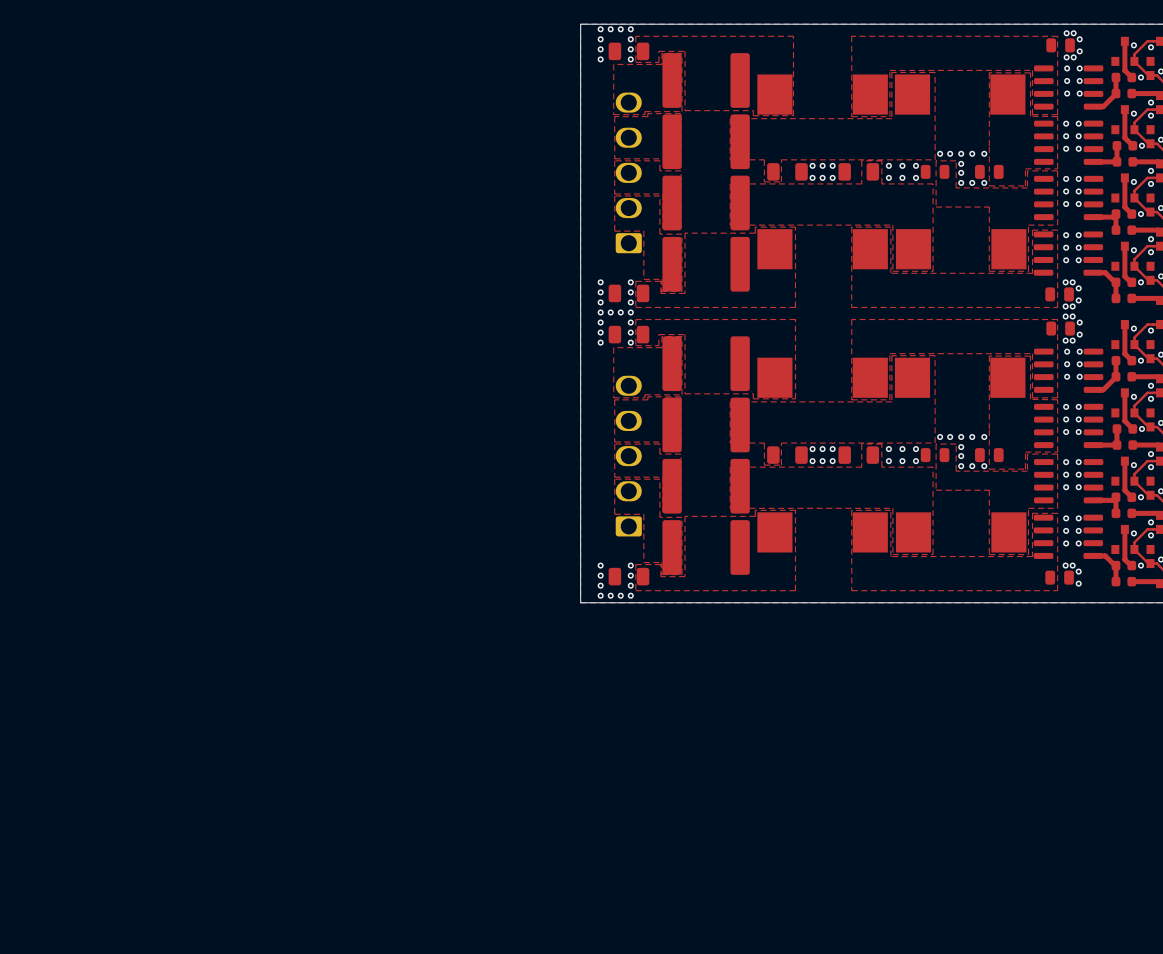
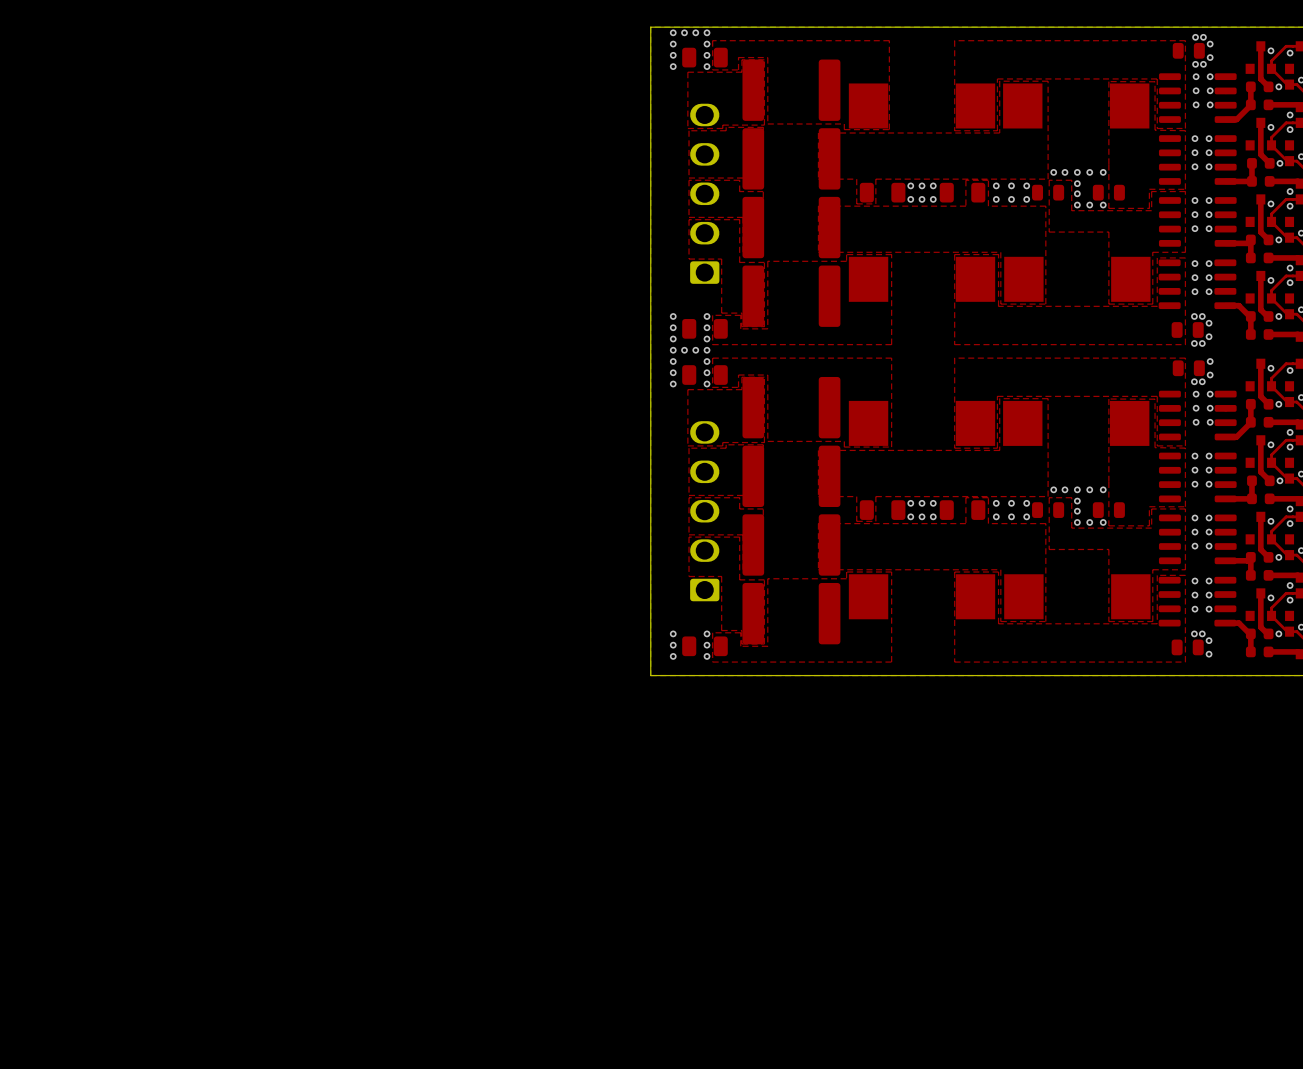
via: (1065, 316) -> none
via: (1072, 316) -> none
via: (600, 595) -> none
via: (610, 595) -> none
via: (620, 595) -> none
via: (630, 595) -> none

